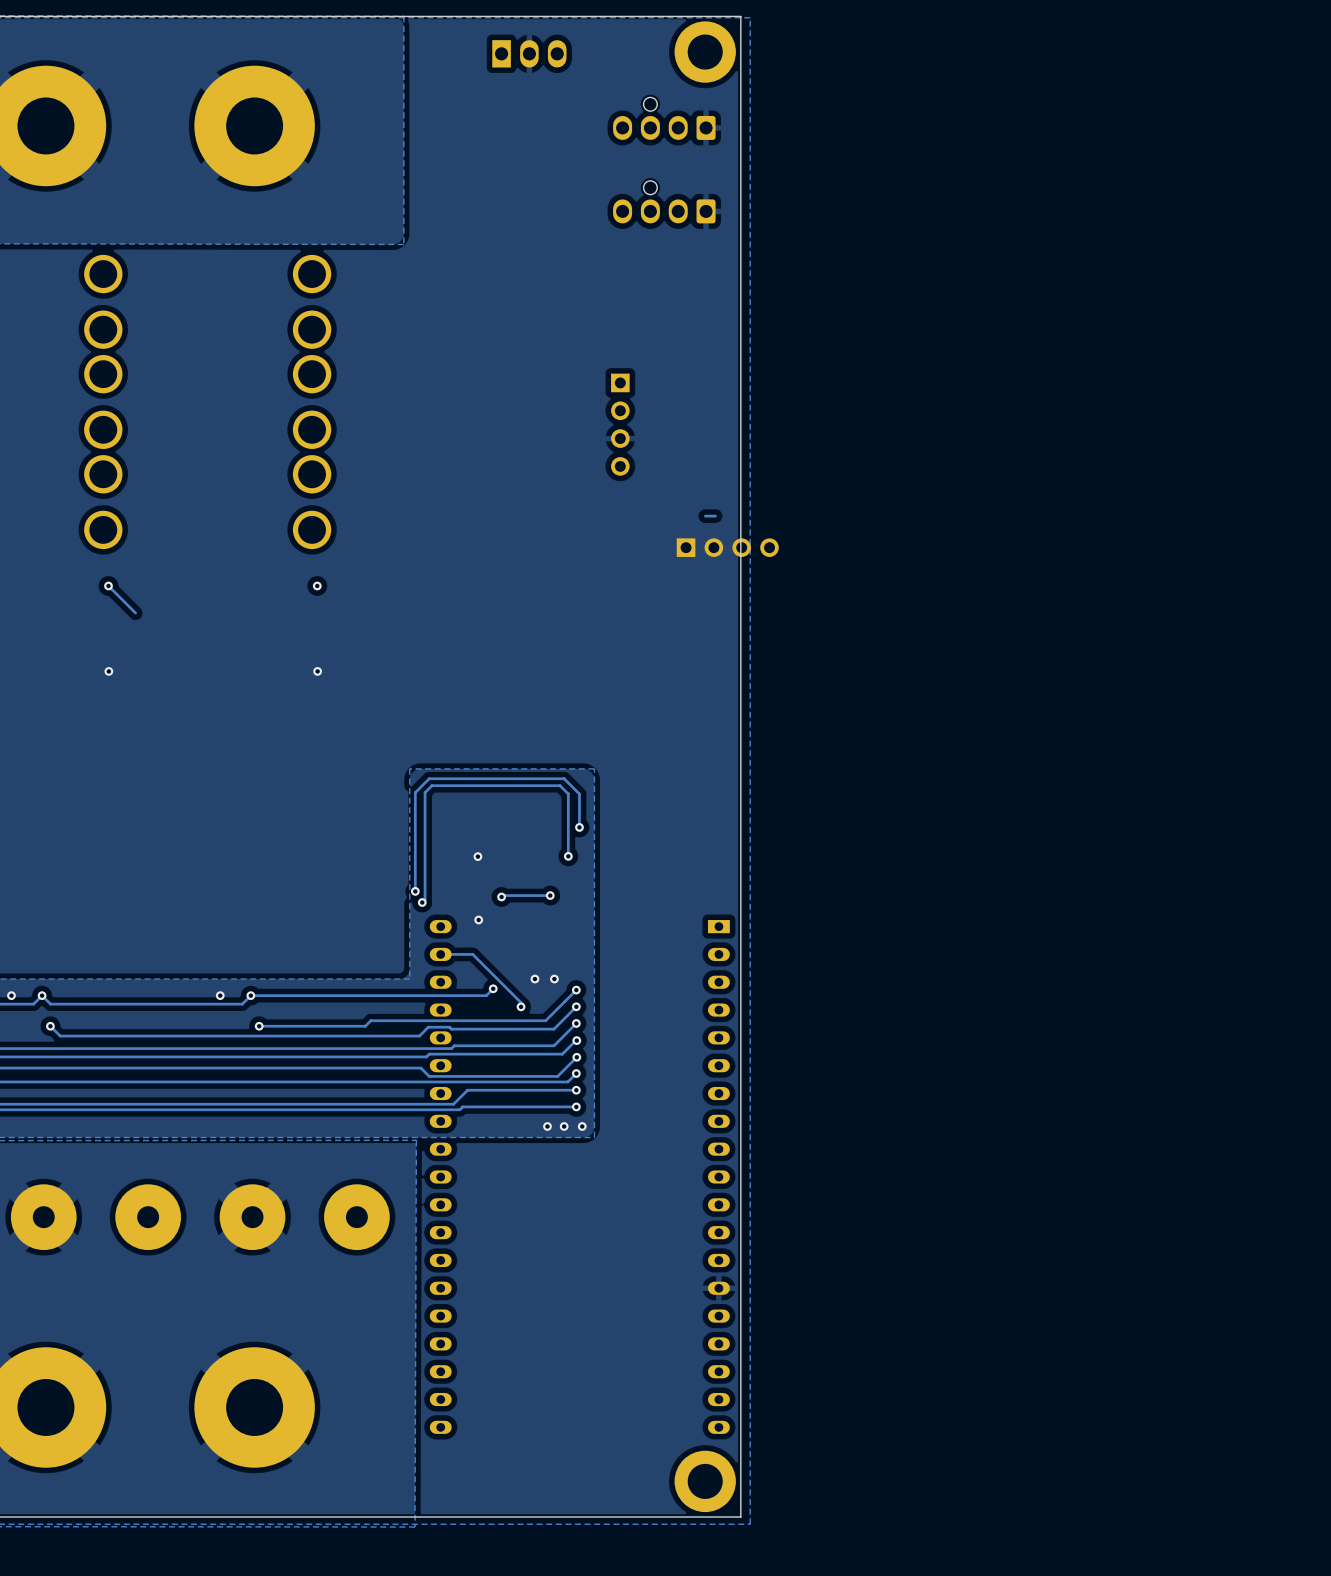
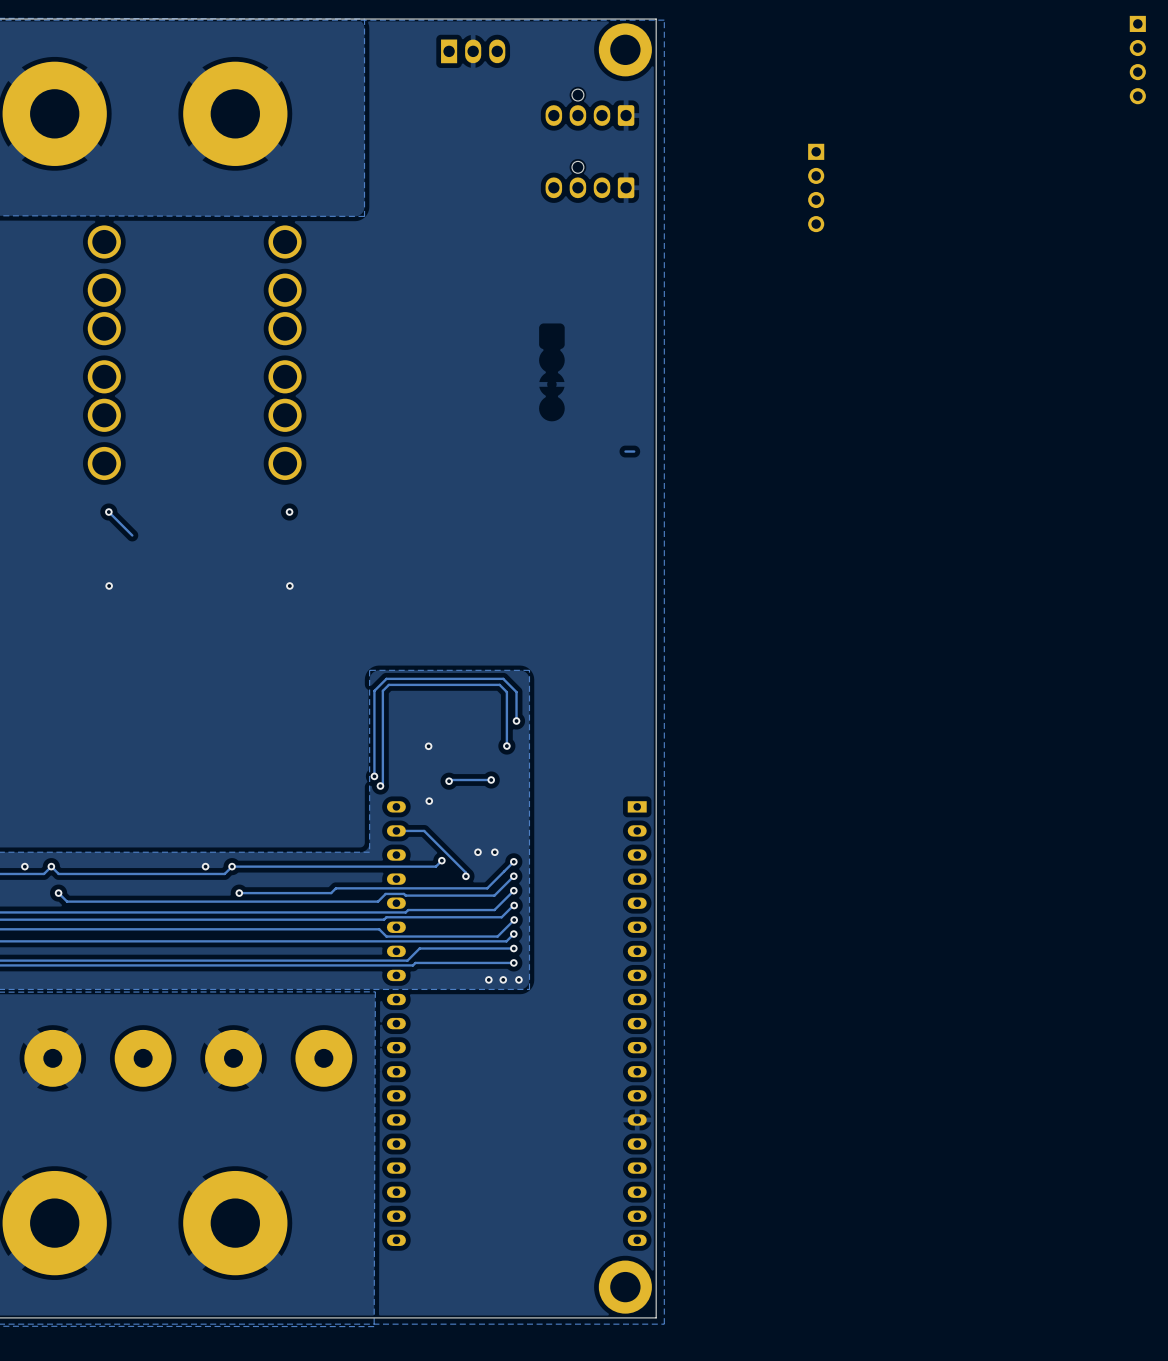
part: none -> (1137, 60)
part: none -> (816, 187)
part: (620, 424) -> none
part: (727, 547) -> none

